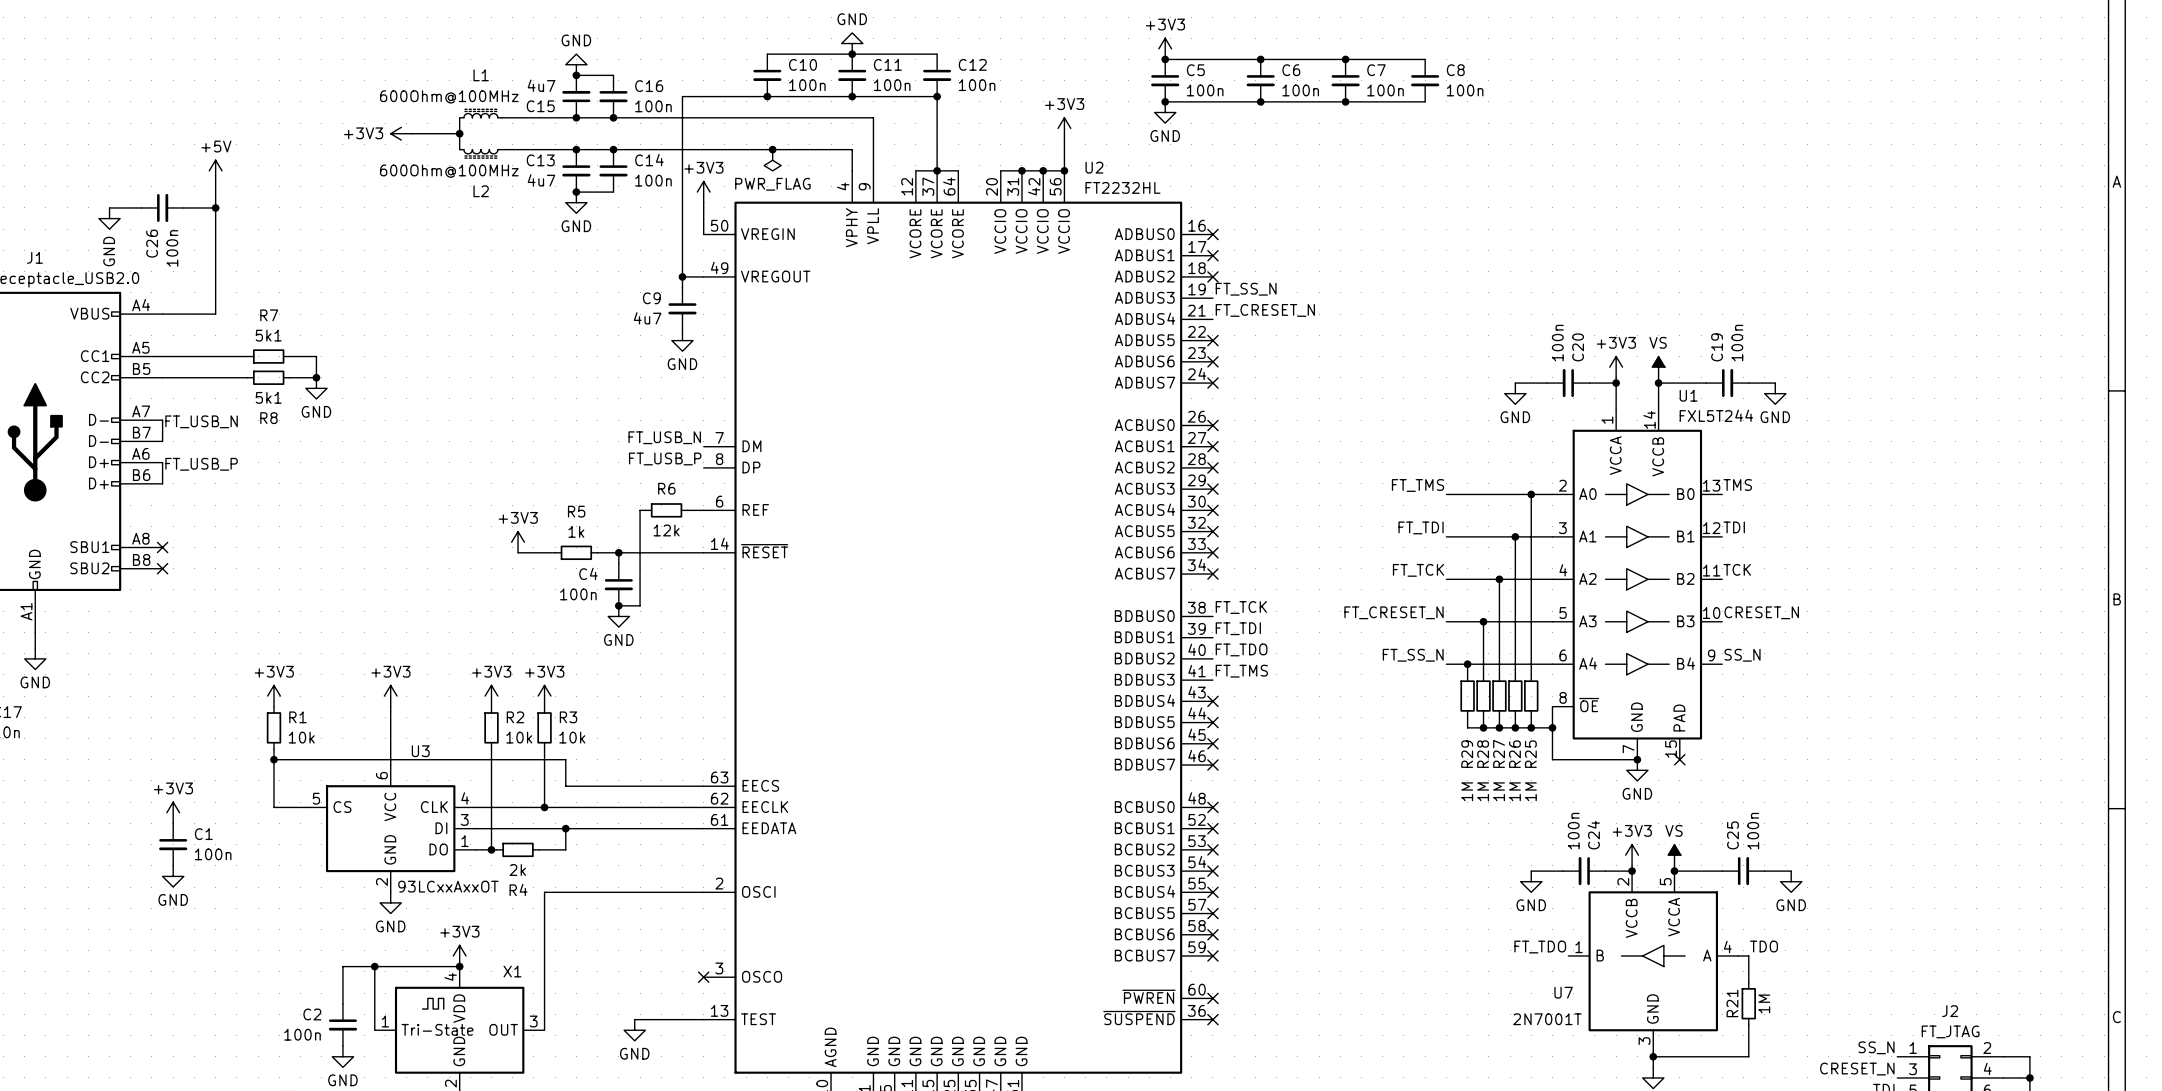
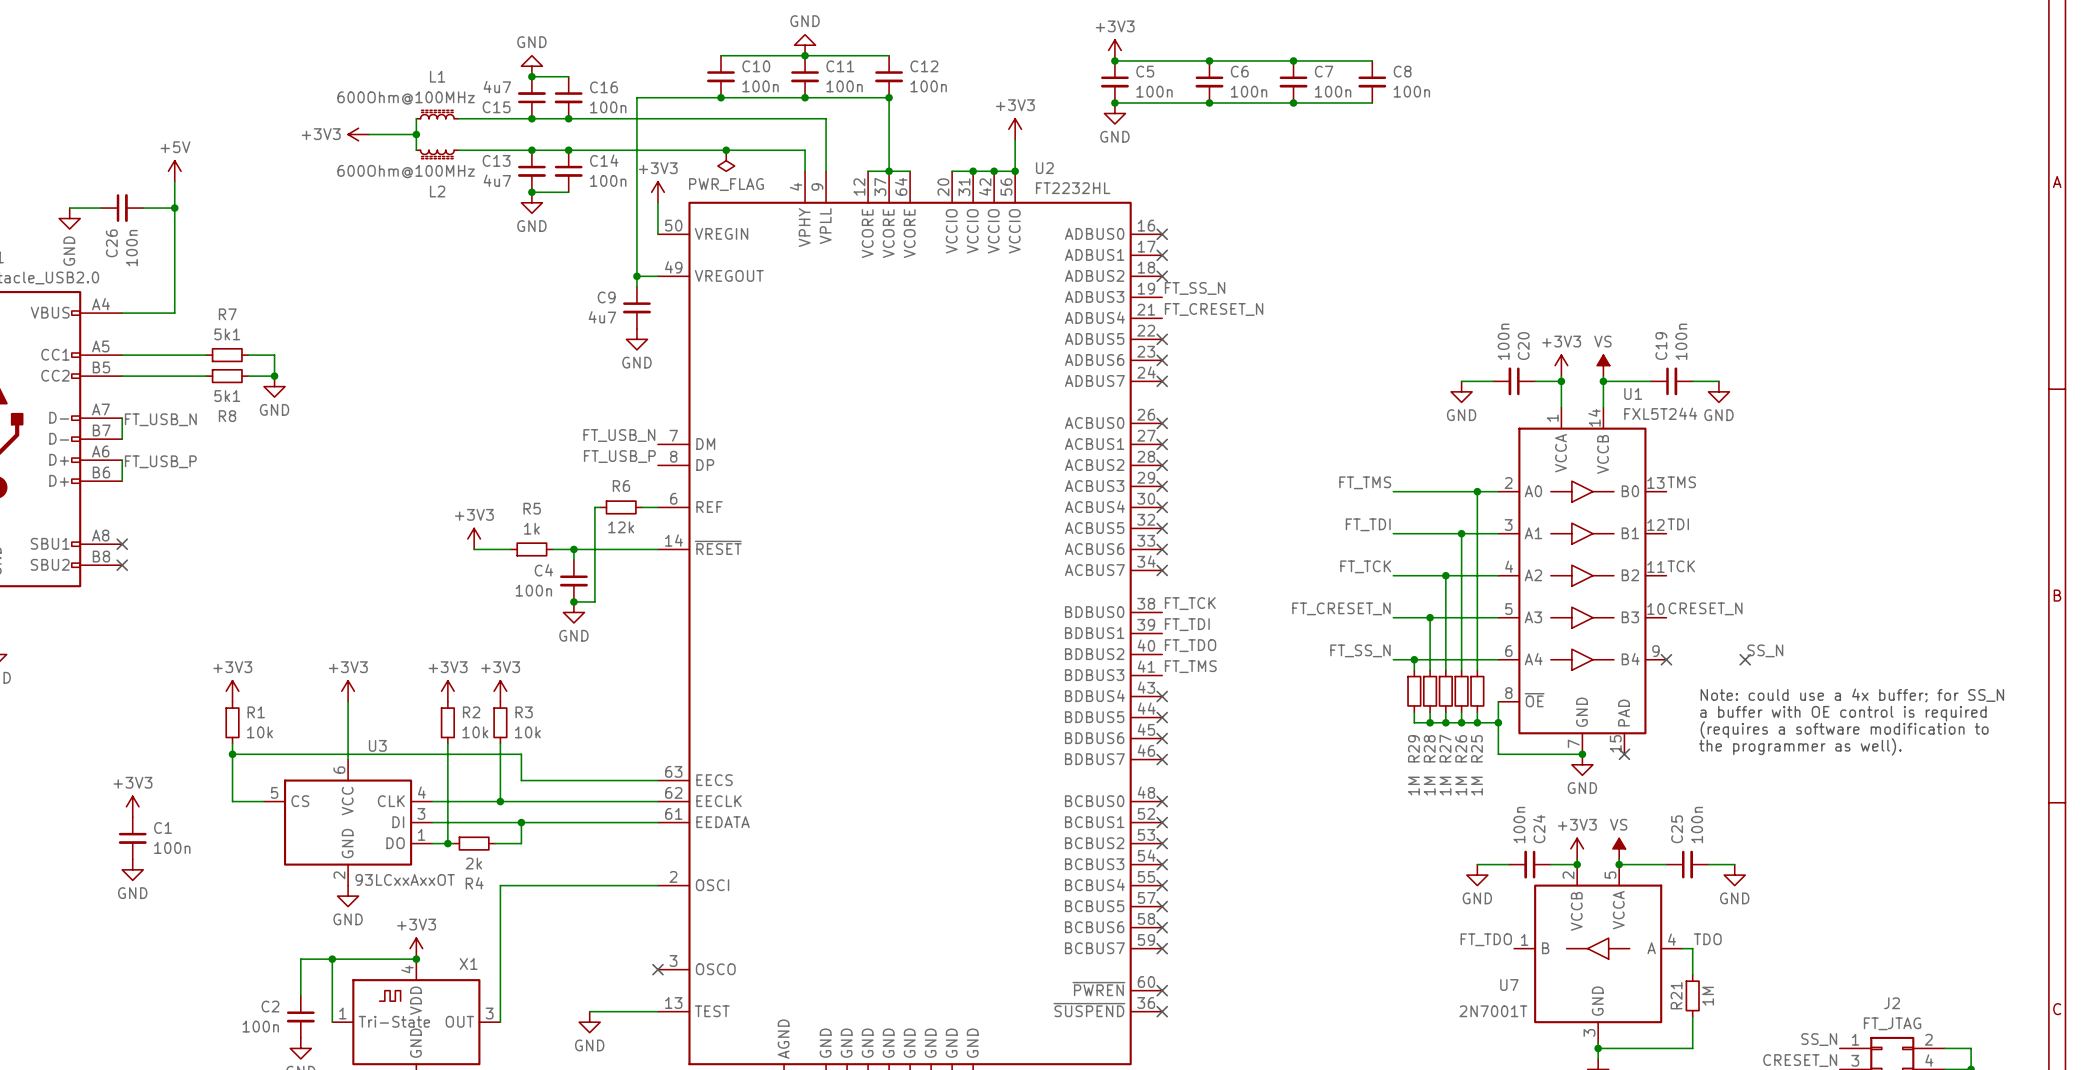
label position: SS_N (1742, 655) -> SS_N (1765, 650)
no-connect mark: none -> (1666, 659)
no-connect mark: none -> (1745, 659)
text: none -> Note: could use a 4x buffer; for SS_N (1852, 695)
text: none -> a buffer with OE control is required (1843, 713)
text: none -> (requires a software modification to (1844, 730)
text: none -> the programmer as well). (1800, 746)

